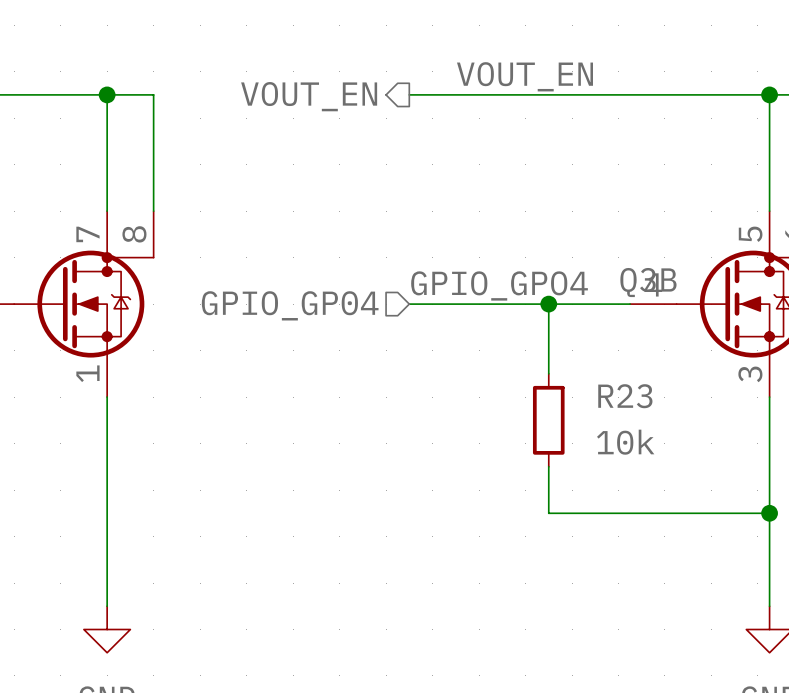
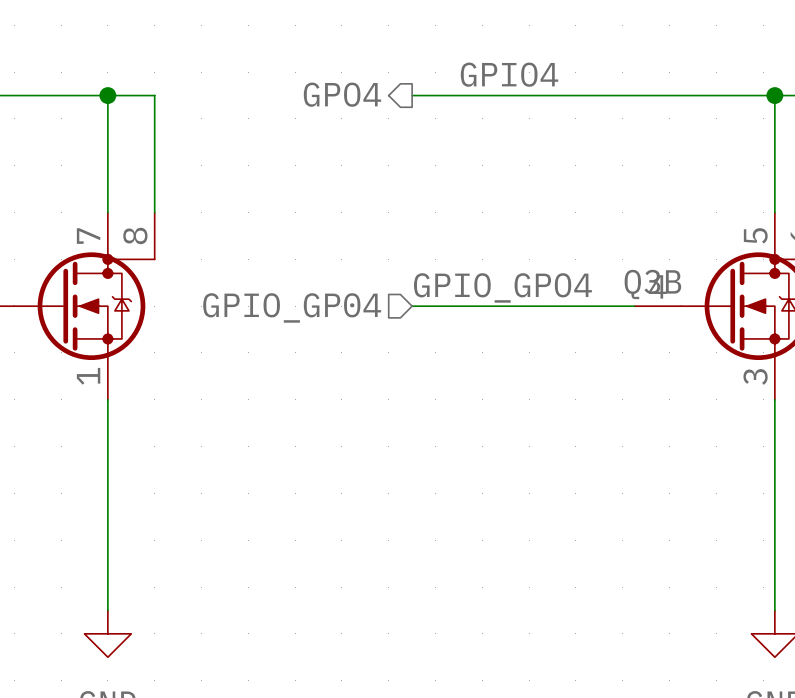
label: VOUT_EN (524, 76) -> GPIO4 (509, 74)
hierarchical label: VOUT_EN (309, 96) -> GPO4 (342, 94)
wire: (548, 304) (548, 373) -> none
junction: (548, 304) -> none
R23: 10k (548, 420) -> none
wire: (548, 466) (548, 513) (769, 513) -> none
junction: (769, 513) -> none

